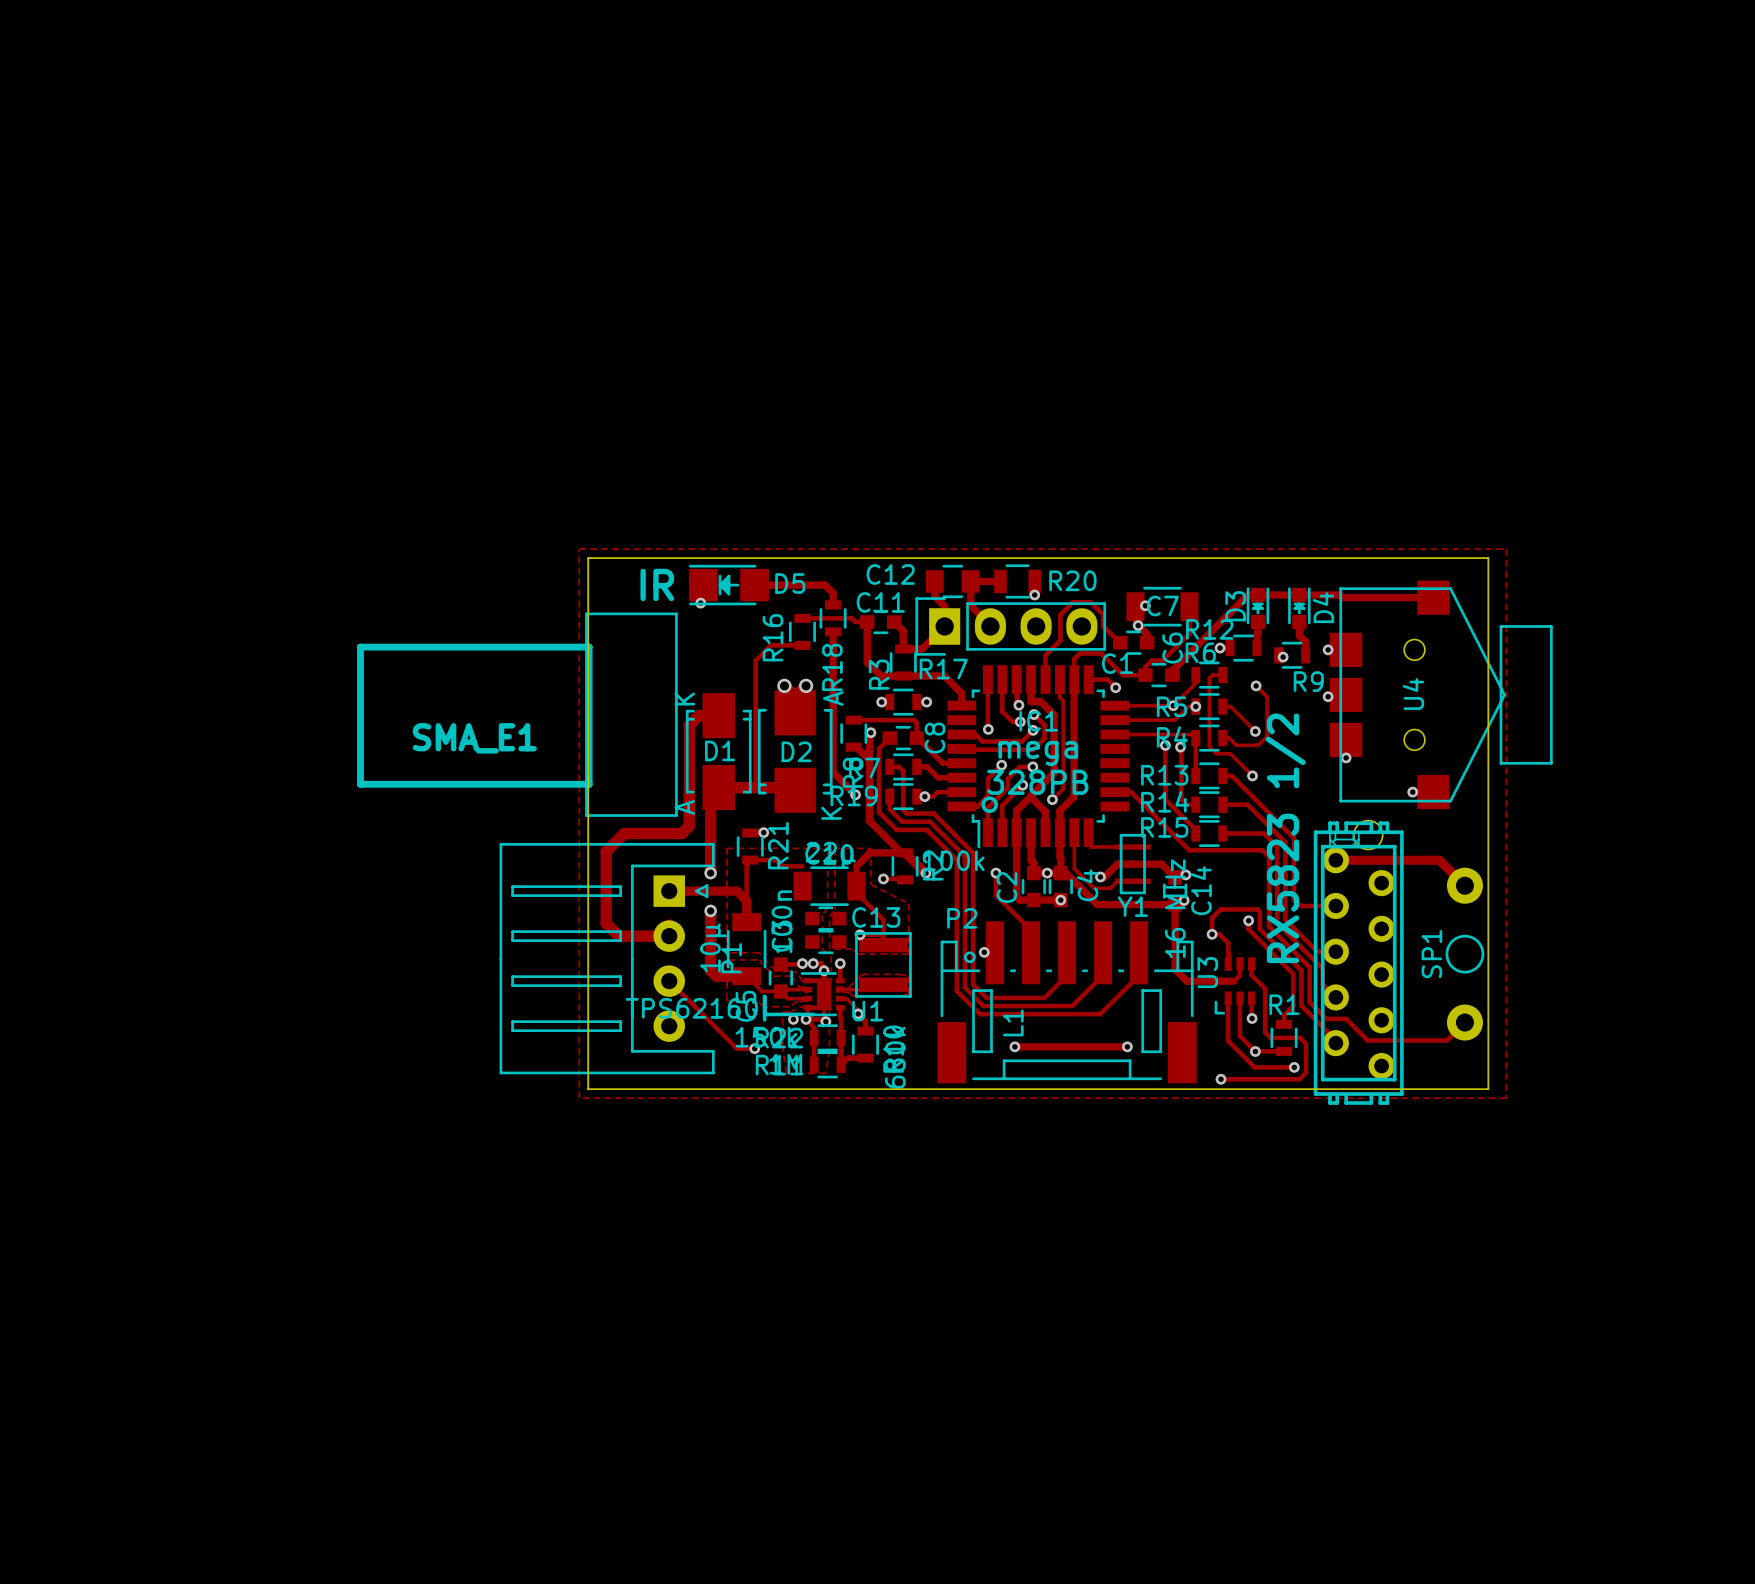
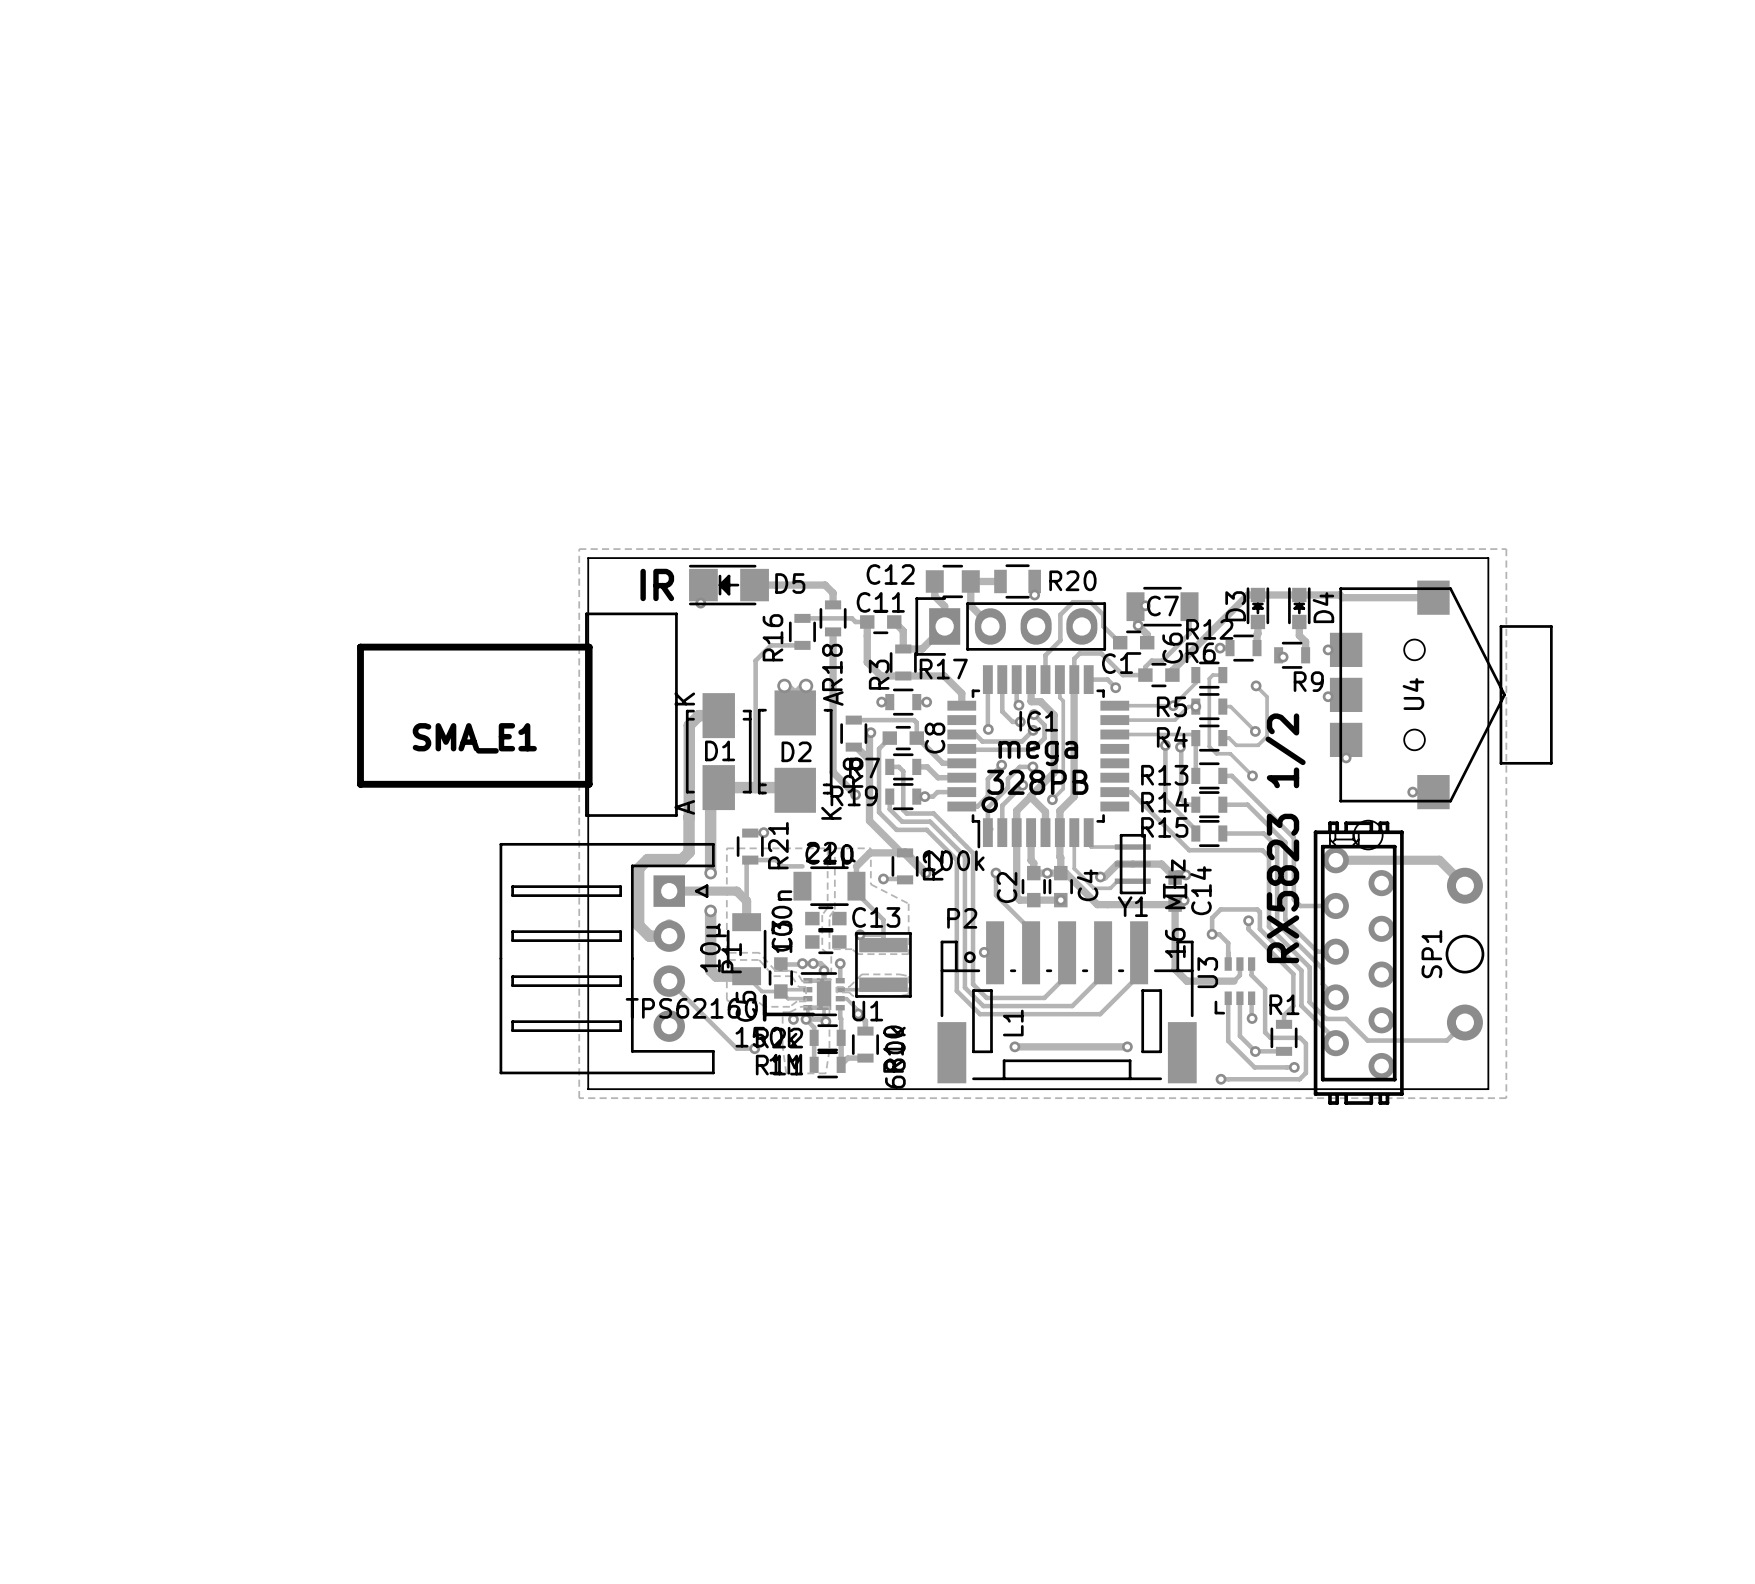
track: (689, 817) (689, 826) (681, 833) (624, 833) (606, 851) (606, 923) (618, 936) (649, 936) -> (689, 817) (689, 852) (681, 859) (647, 859) (638, 868) (638, 925) (649, 936)

